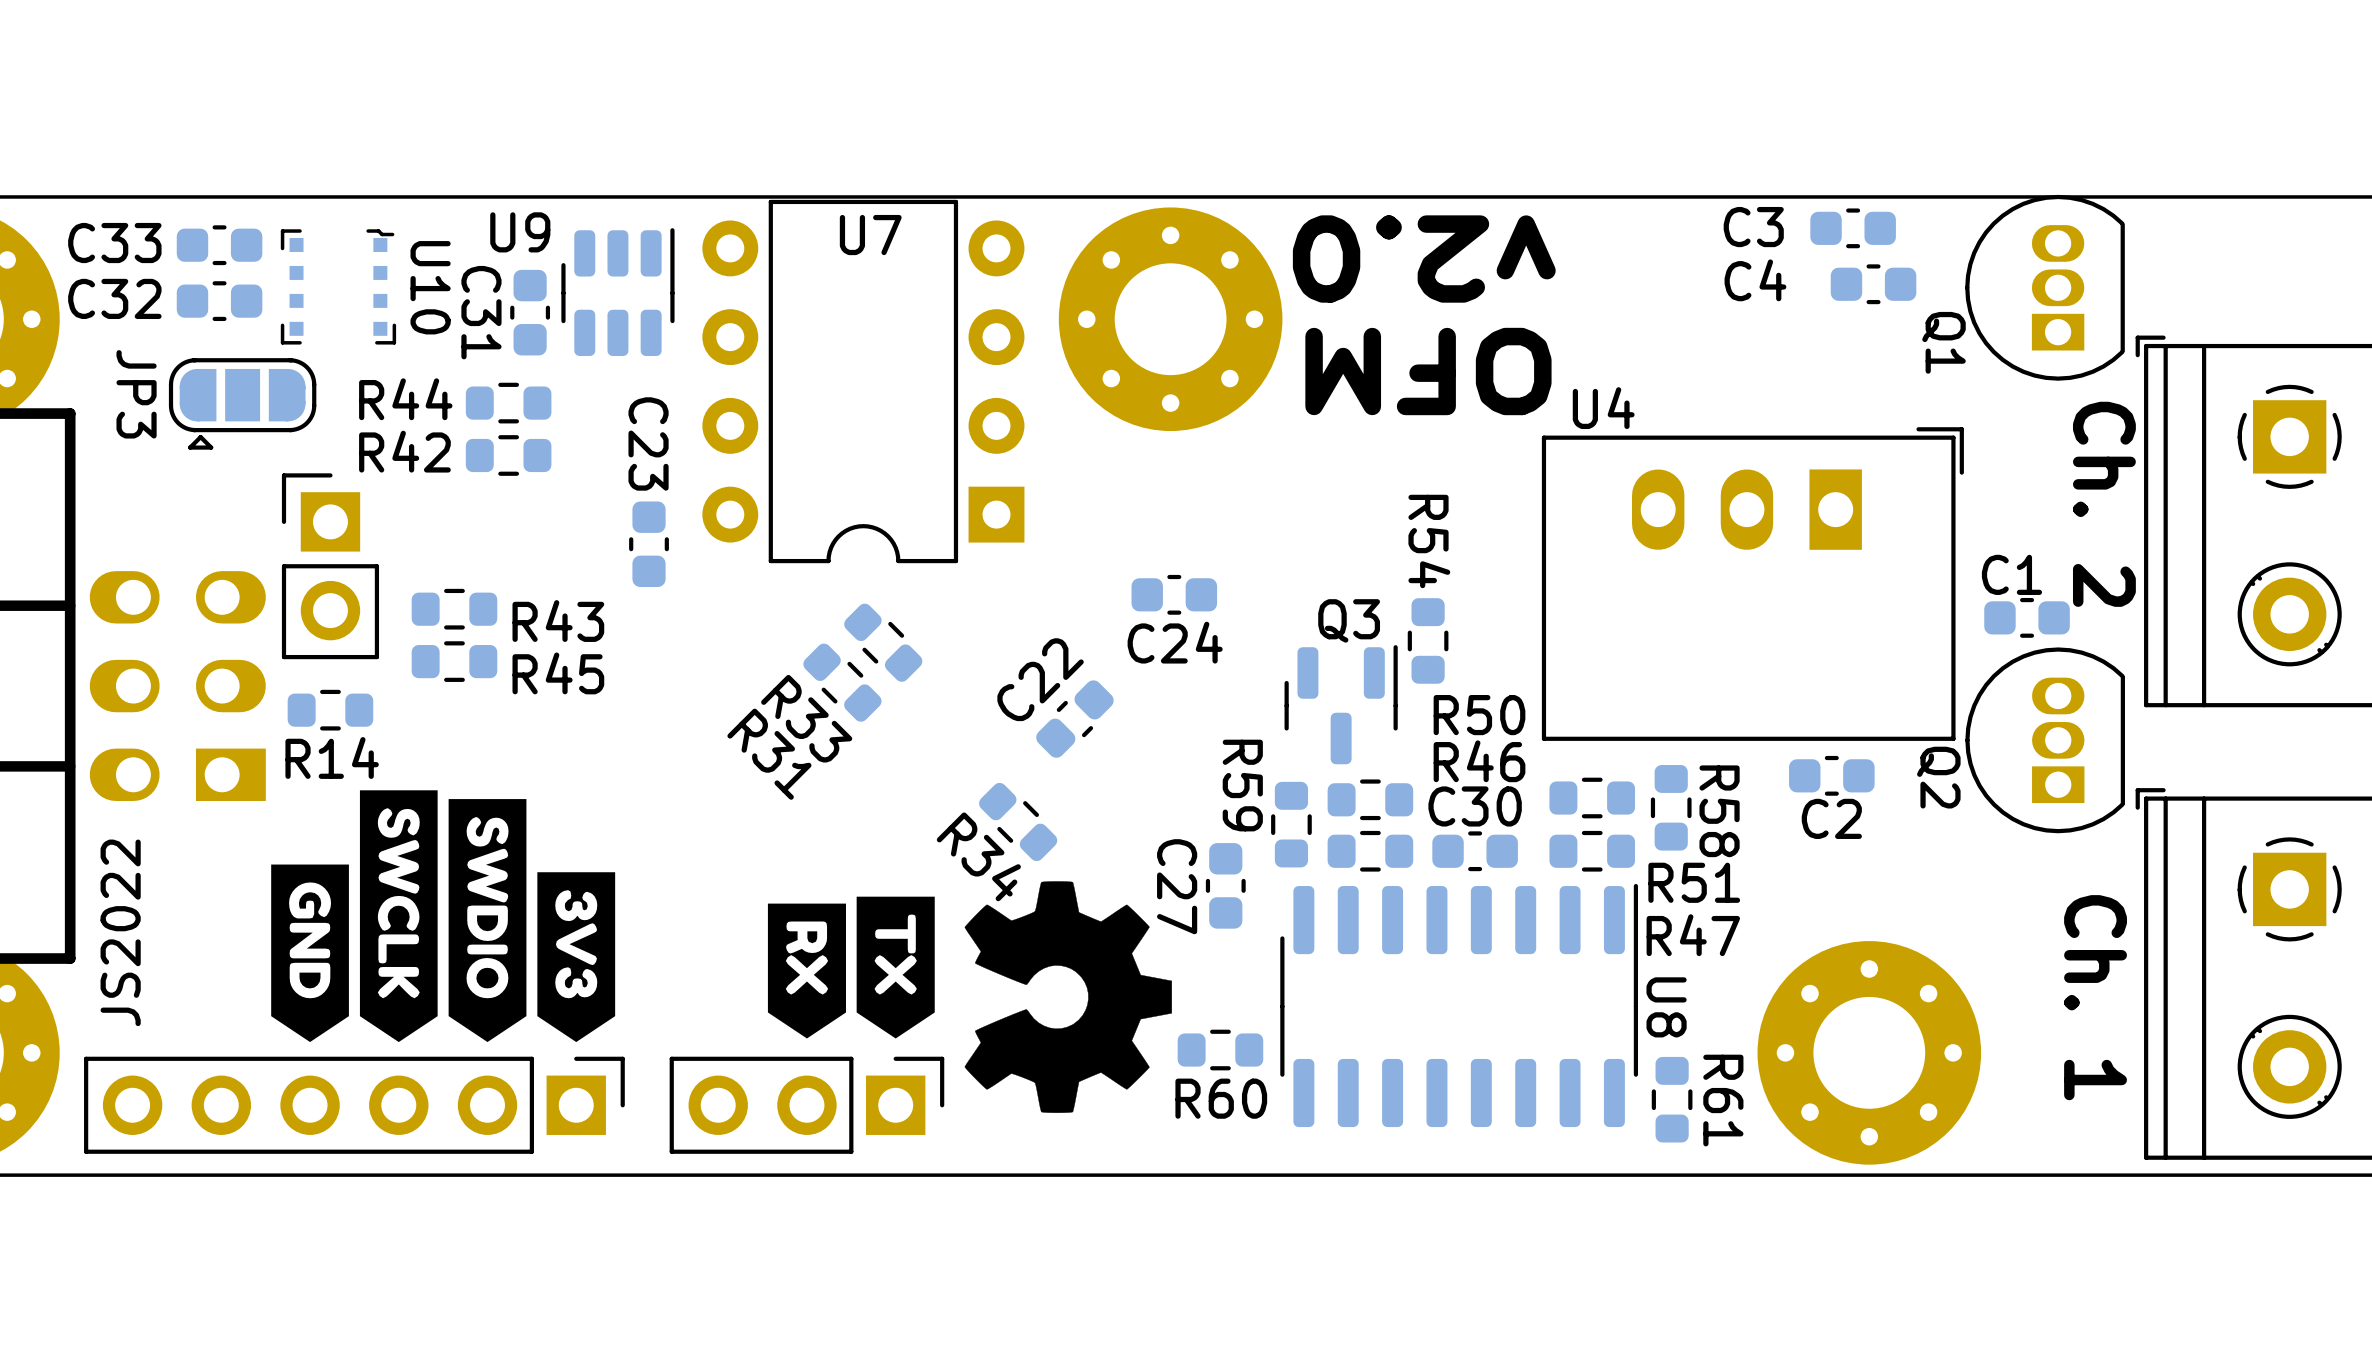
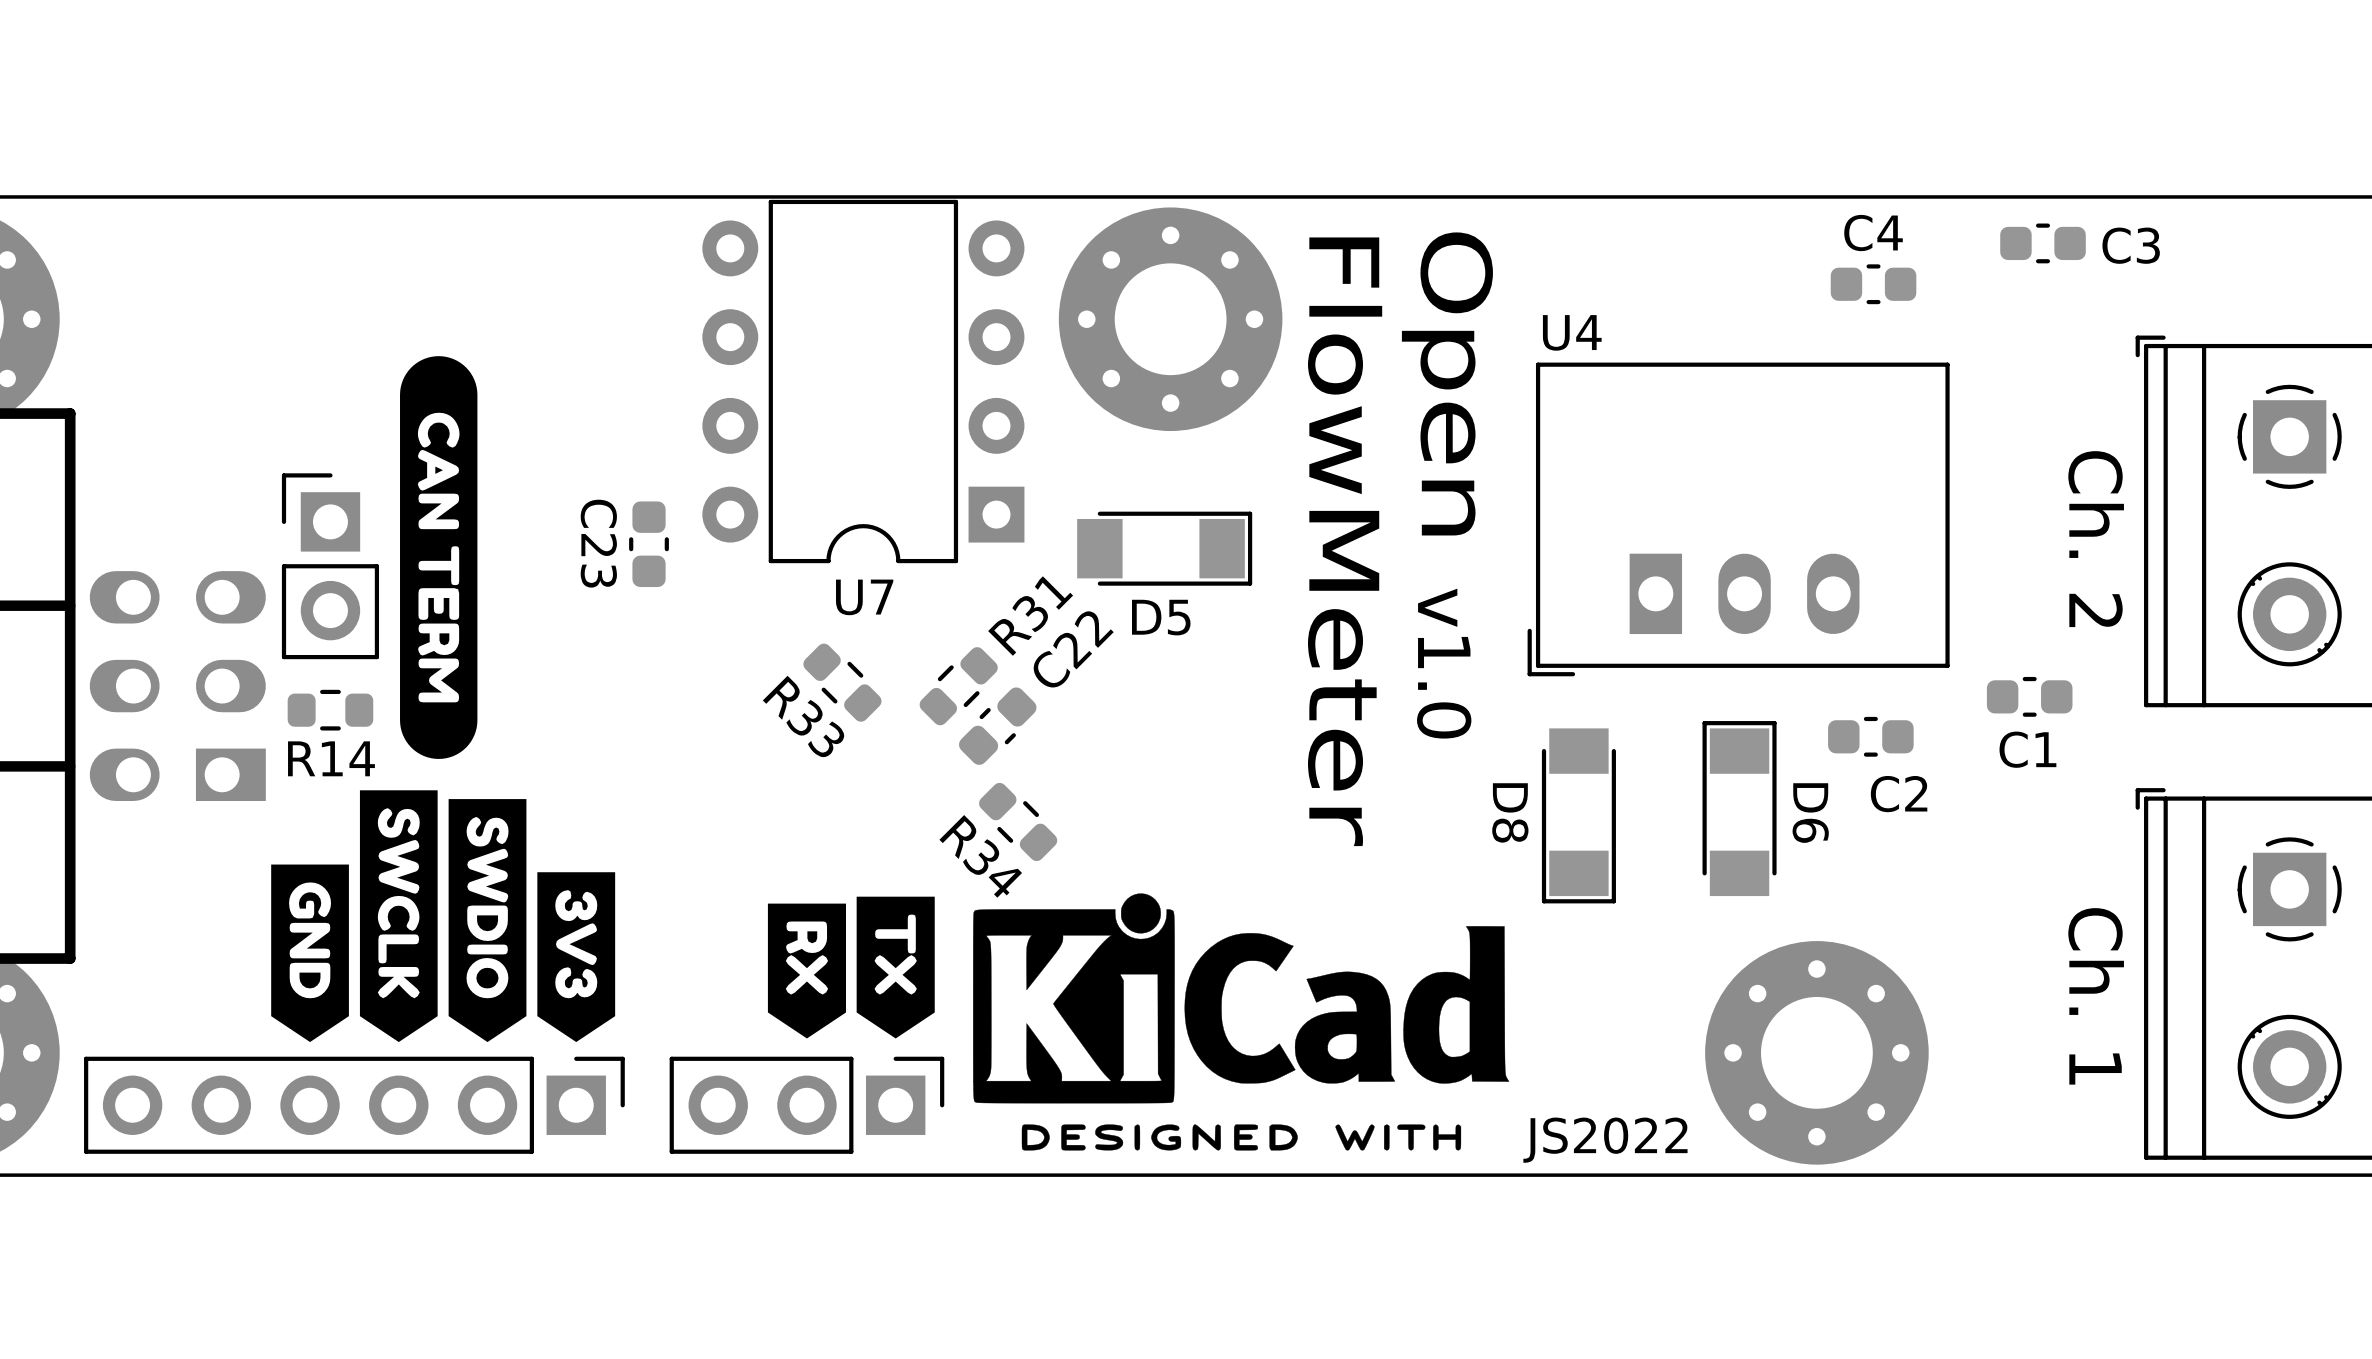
C3 name position: C3 (1753, 227) -> C3 (2131, 245)
C3 position: (1853, 228) -> (2043, 243)
U7 name position: U7 (870, 235) -> U7 (864, 597)
C33: (219, 245) -> none
text: v2.0 (1424, 259) -> none
C4 name position: C4 (1755, 280) -> C4 (1873, 233)
U10: (338, 286) -> none
Q1: (2044, 287) -> none
U9: (617, 292) -> none
C32: (219, 301) -> none
C31: (530, 312) -> none
drawing: none -> [400, 356, 478, 759]
text: OFM (1428, 371) -> none
text: none -> Open (1447, 383)
JP3: (242, 403) -> none
R44: (508, 403) -> none
C23 name position: C23 (648, 443) -> C23 (598, 543)
R42: (508, 455) -> none
text position: Ch. 2 (2104, 504) -> Ch. 2 (2096, 539)
D5: none -> (1164, 548)
text: none -> FlowMeter (1345, 541)
C1 name position: C1 (2011, 574) -> C1 (2027, 749)
U4 rotation: 0° (1752, 584) -> 180° (1738, 519)
C24: (1174, 594) -> none
R43: (454, 609) -> none
C1 position: (2027, 617) -> (2029, 696)
R54: (1428, 640) -> none
R33: (883, 642) -> none
R45: (454, 661) -> none
text: none -> v1.0 (1444, 663)
C22 name position: C22 (1040, 679) -> C22 (1073, 649)
R31: none -> (958, 686)
Q3: (1341, 704) -> none
C22 position: (1074, 719) -> (997, 726)
Q2: (2045, 740) -> none
R31 name: R31 (769, 754) -> R33 (803, 716)
C2 position: (1831, 775) -> (1870, 736)
R51: (1592, 798) -> none
R50: (1370, 799) -> none
R58: (1671, 807) -> none
D6: none -> (1739, 808)
D8: none -> (1578, 815)
C2 name position: C2 (1831, 818) -> C2 (1899, 794)
R59: (1291, 824) -> none
R46: (1370, 851) -> none
C30: (1475, 851) -> none
R47: (1592, 851) -> none
drawing: [964, 881, 1172, 1113] -> none
C27: (1225, 885) -> none
drawing: none -> [973, 893, 1510, 1151]
text: JS2022 (120, 932) -> none
U8: (1459, 1005) -> none
R60: (1220, 1050) -> none
part position: (1869, 1052) -> (1816, 1052)
R61: (1672, 1099) -> none
text: none -> JS2022 (1605, 1140)

